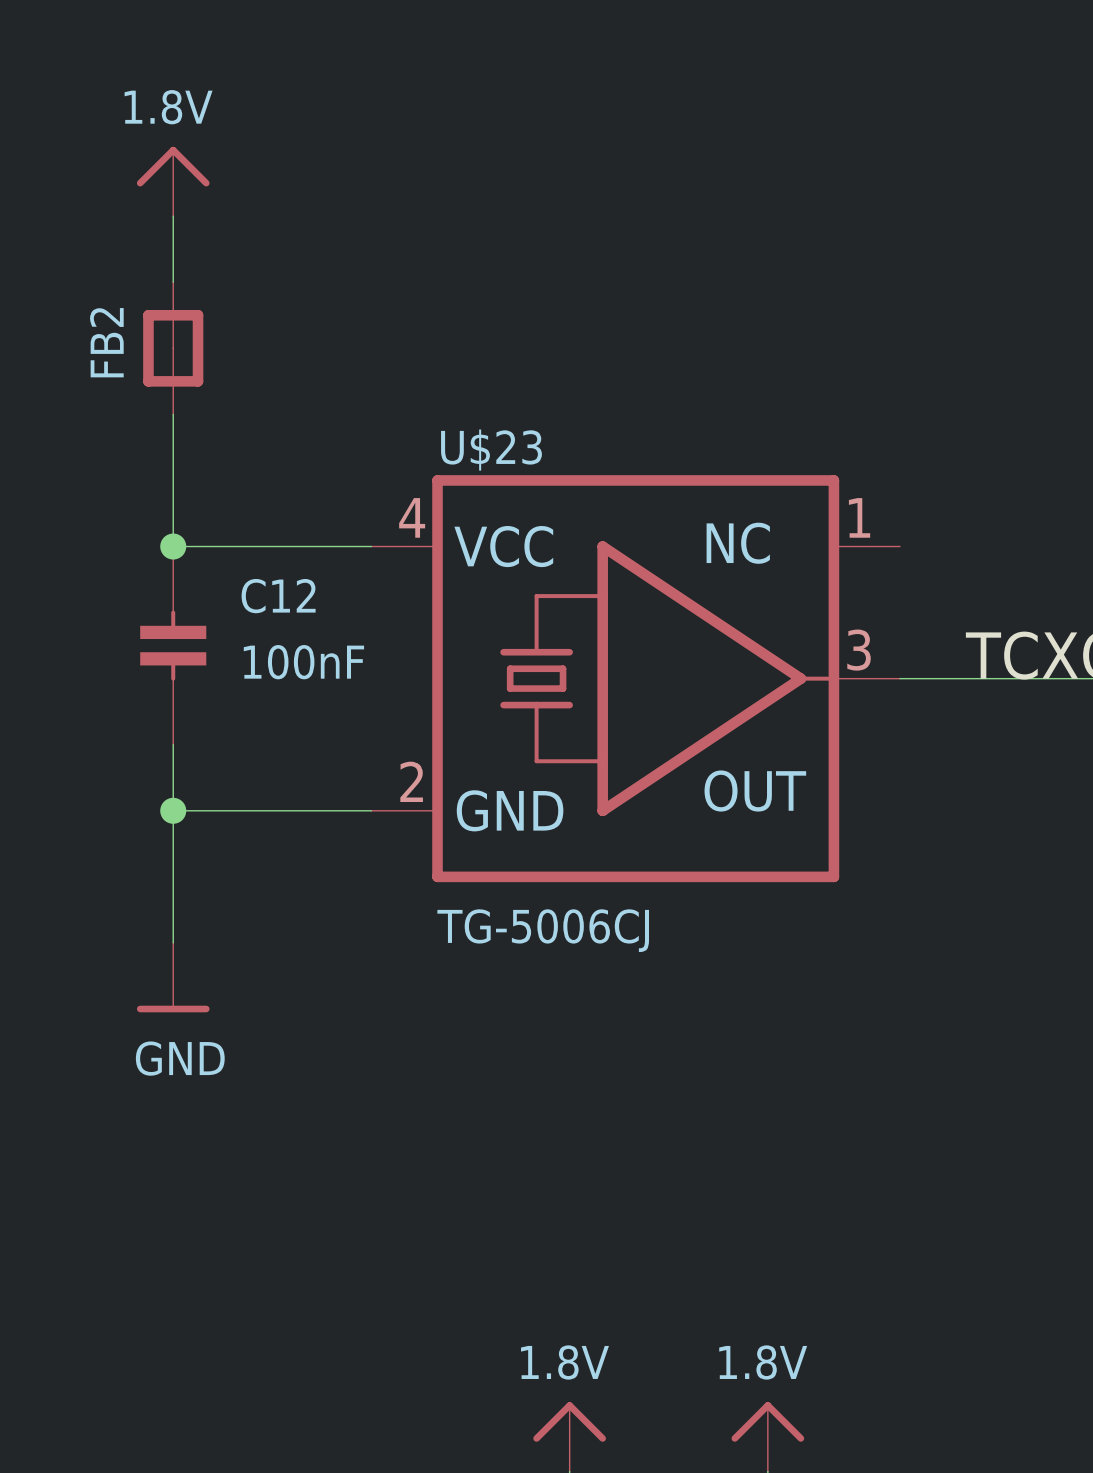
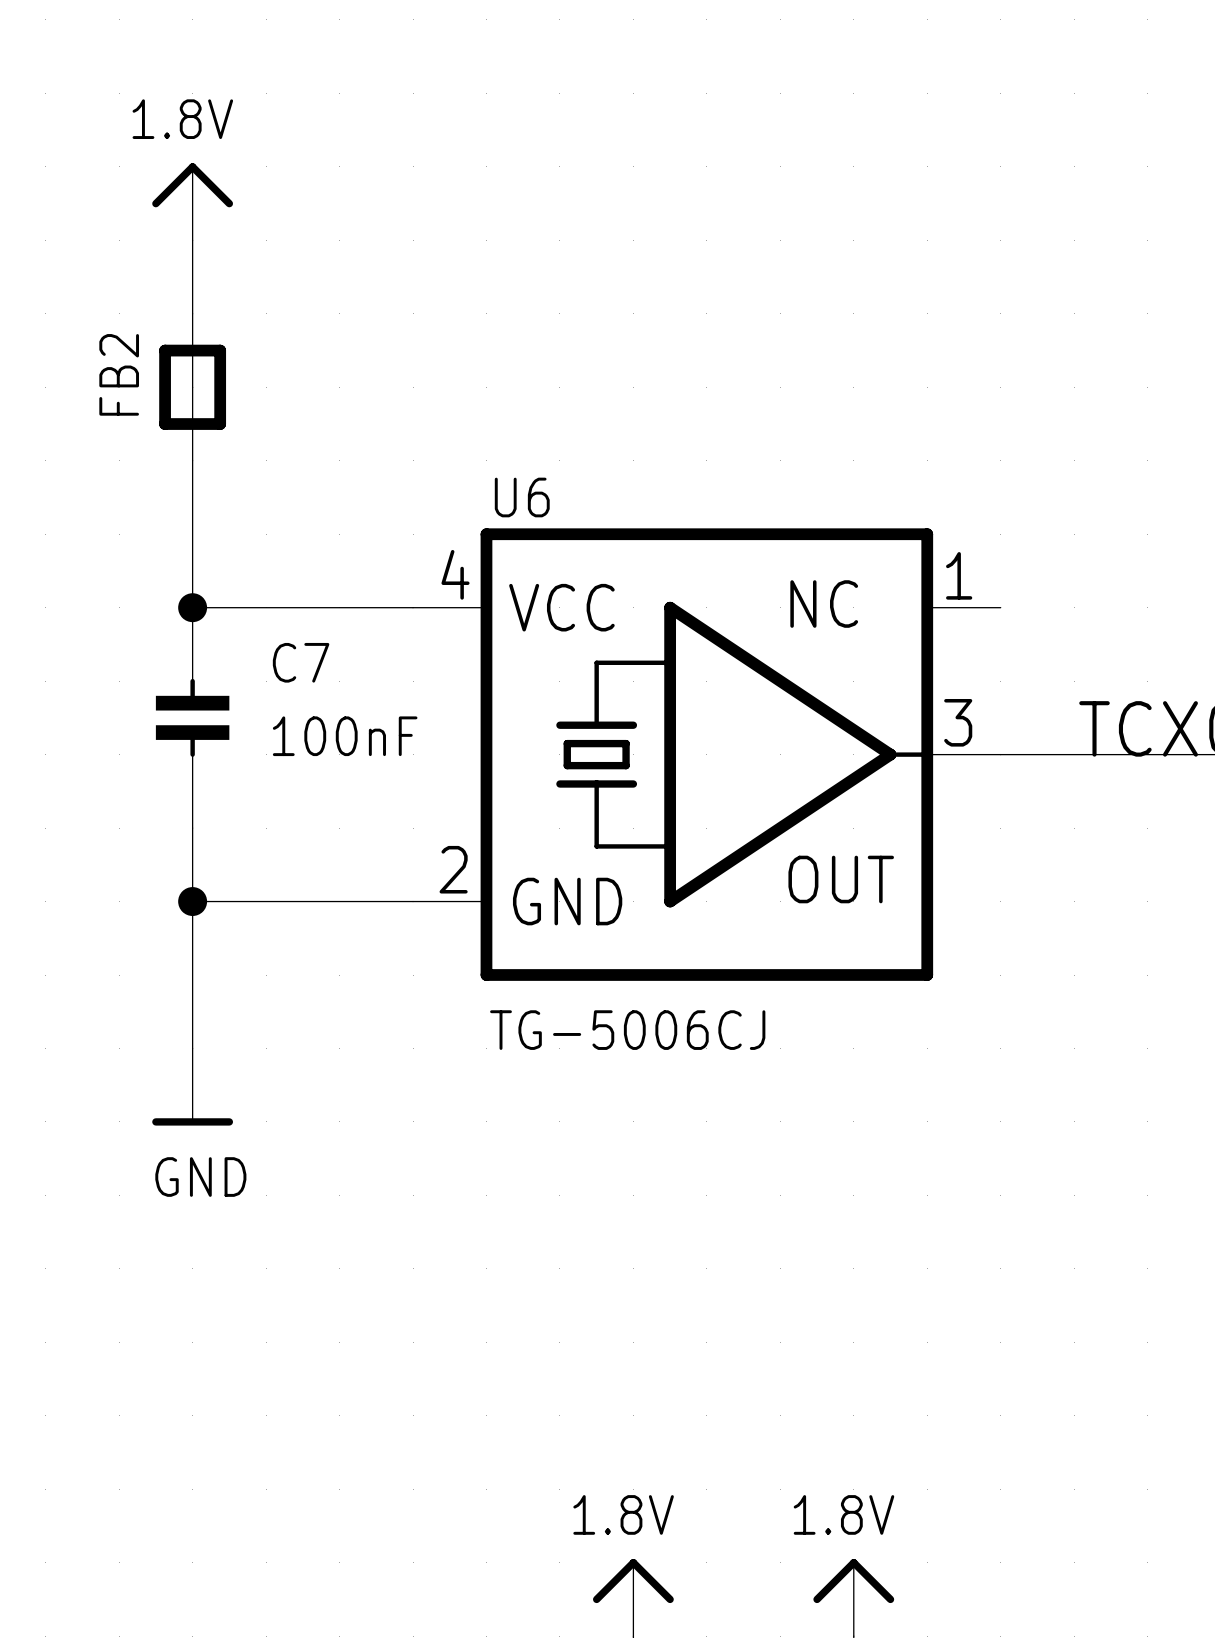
U$23 name: U$23 (491, 450) -> U6 (522, 497)
C12 name: C12 (278, 596) -> C7 (301, 662)

